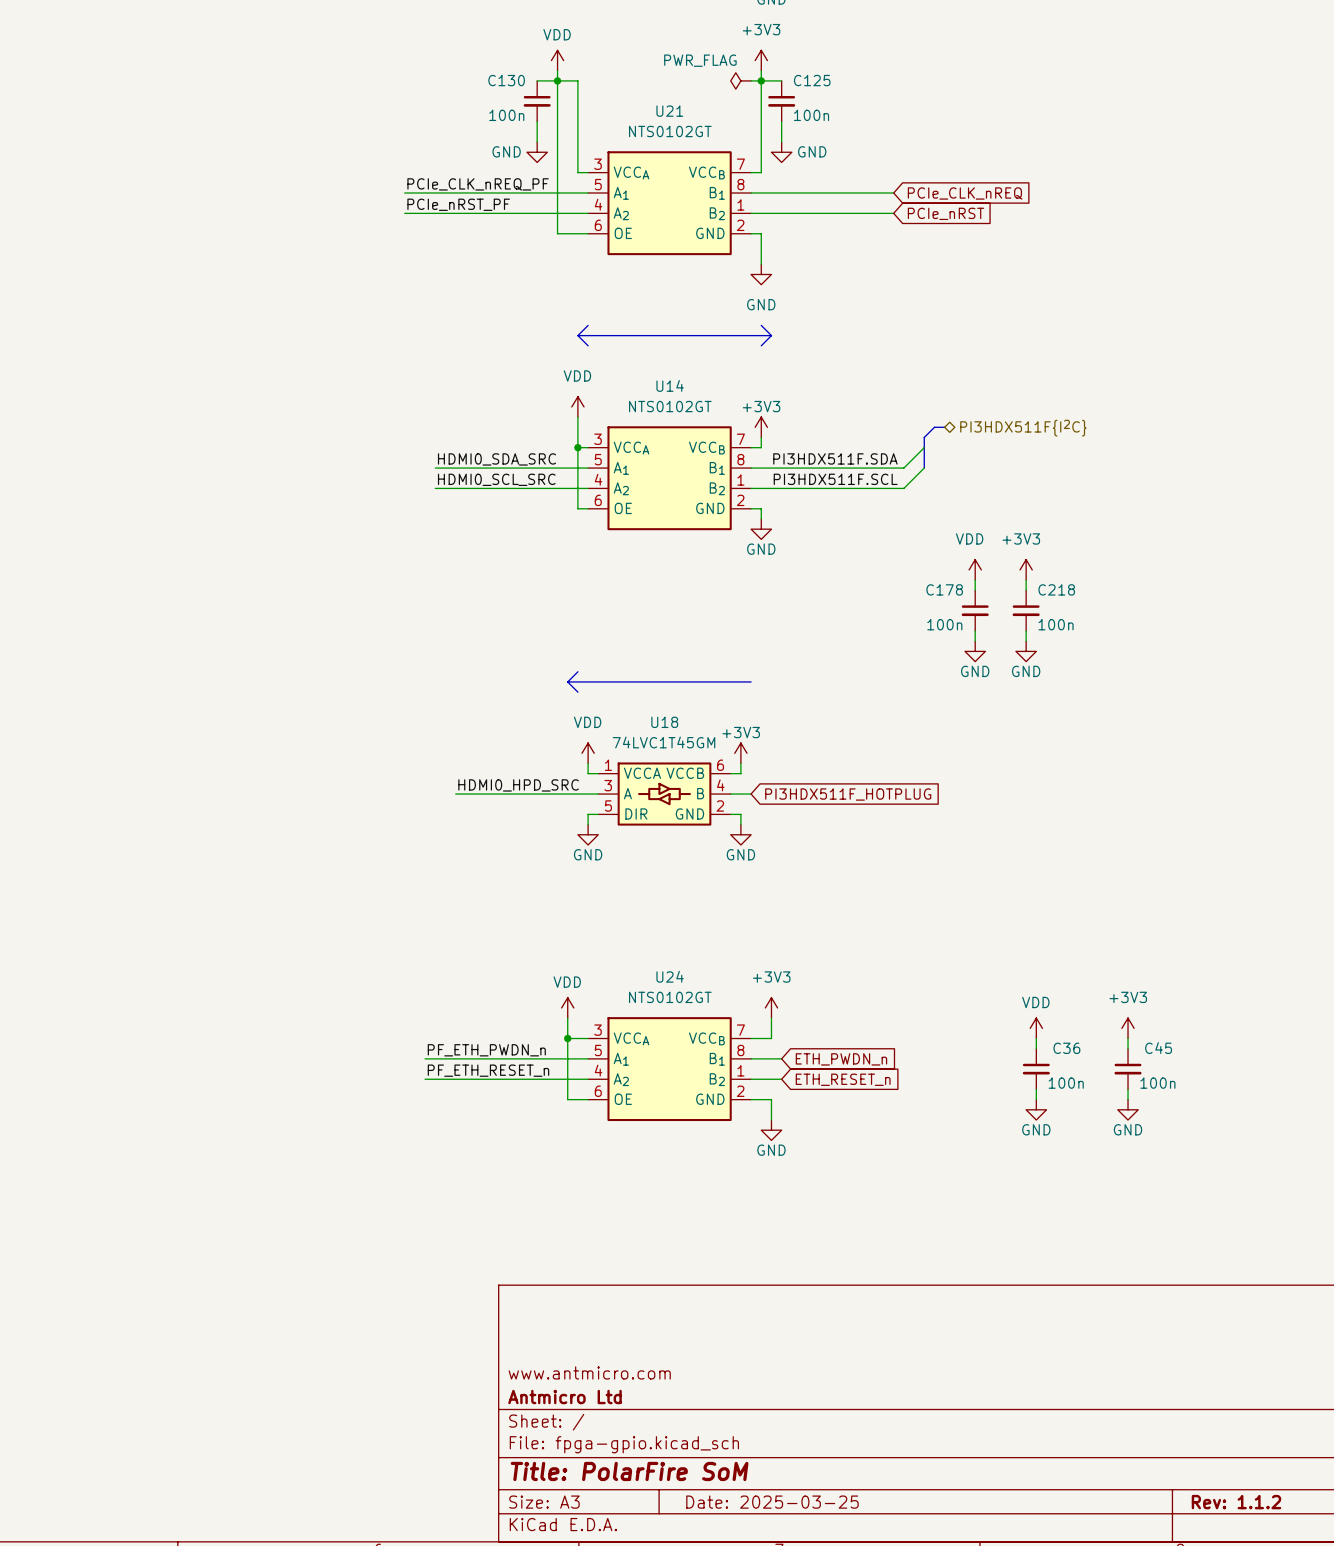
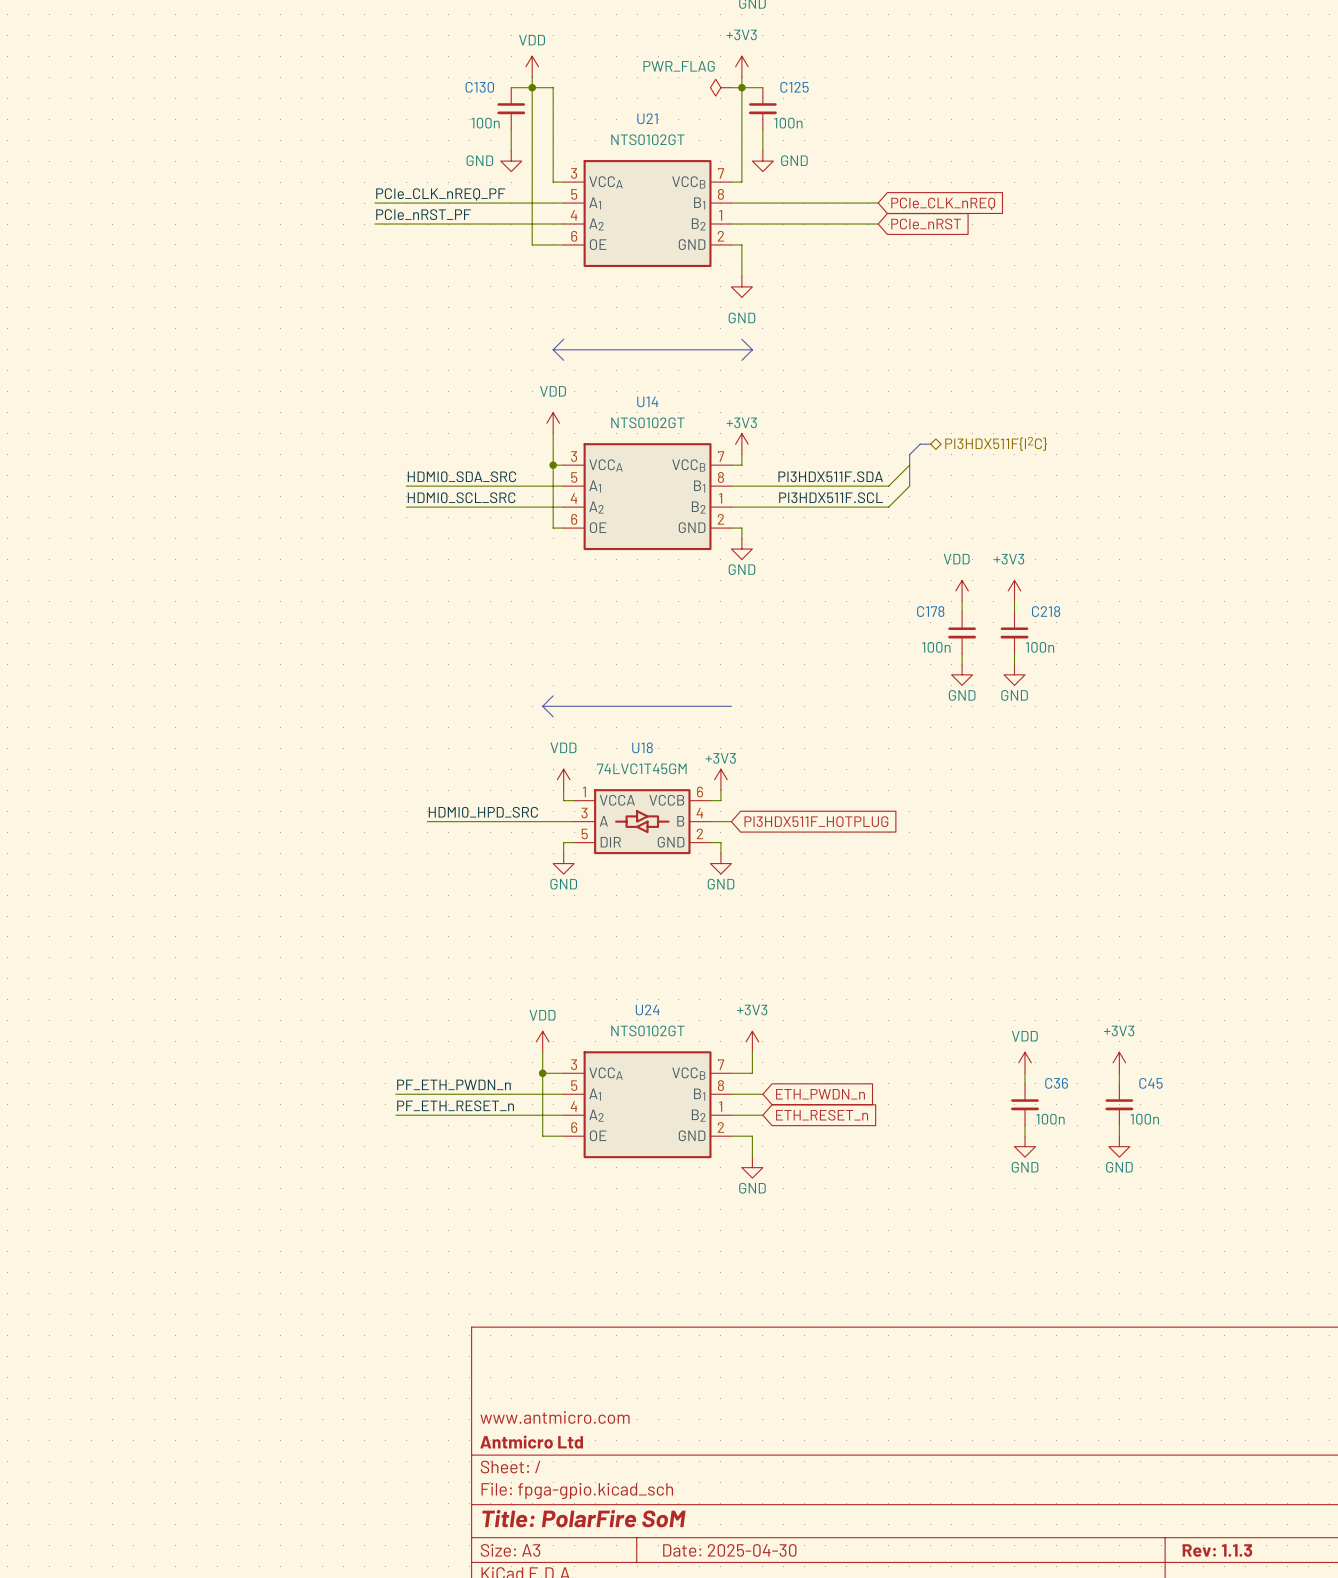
title block: Date: 2025-03-25 (772, 1502) -> Date: 2025-04-30 (729, 1550)
title block: Rev: 1.1.2 (1236, 1502) -> Rev: 1.1.3 (1217, 1550)

